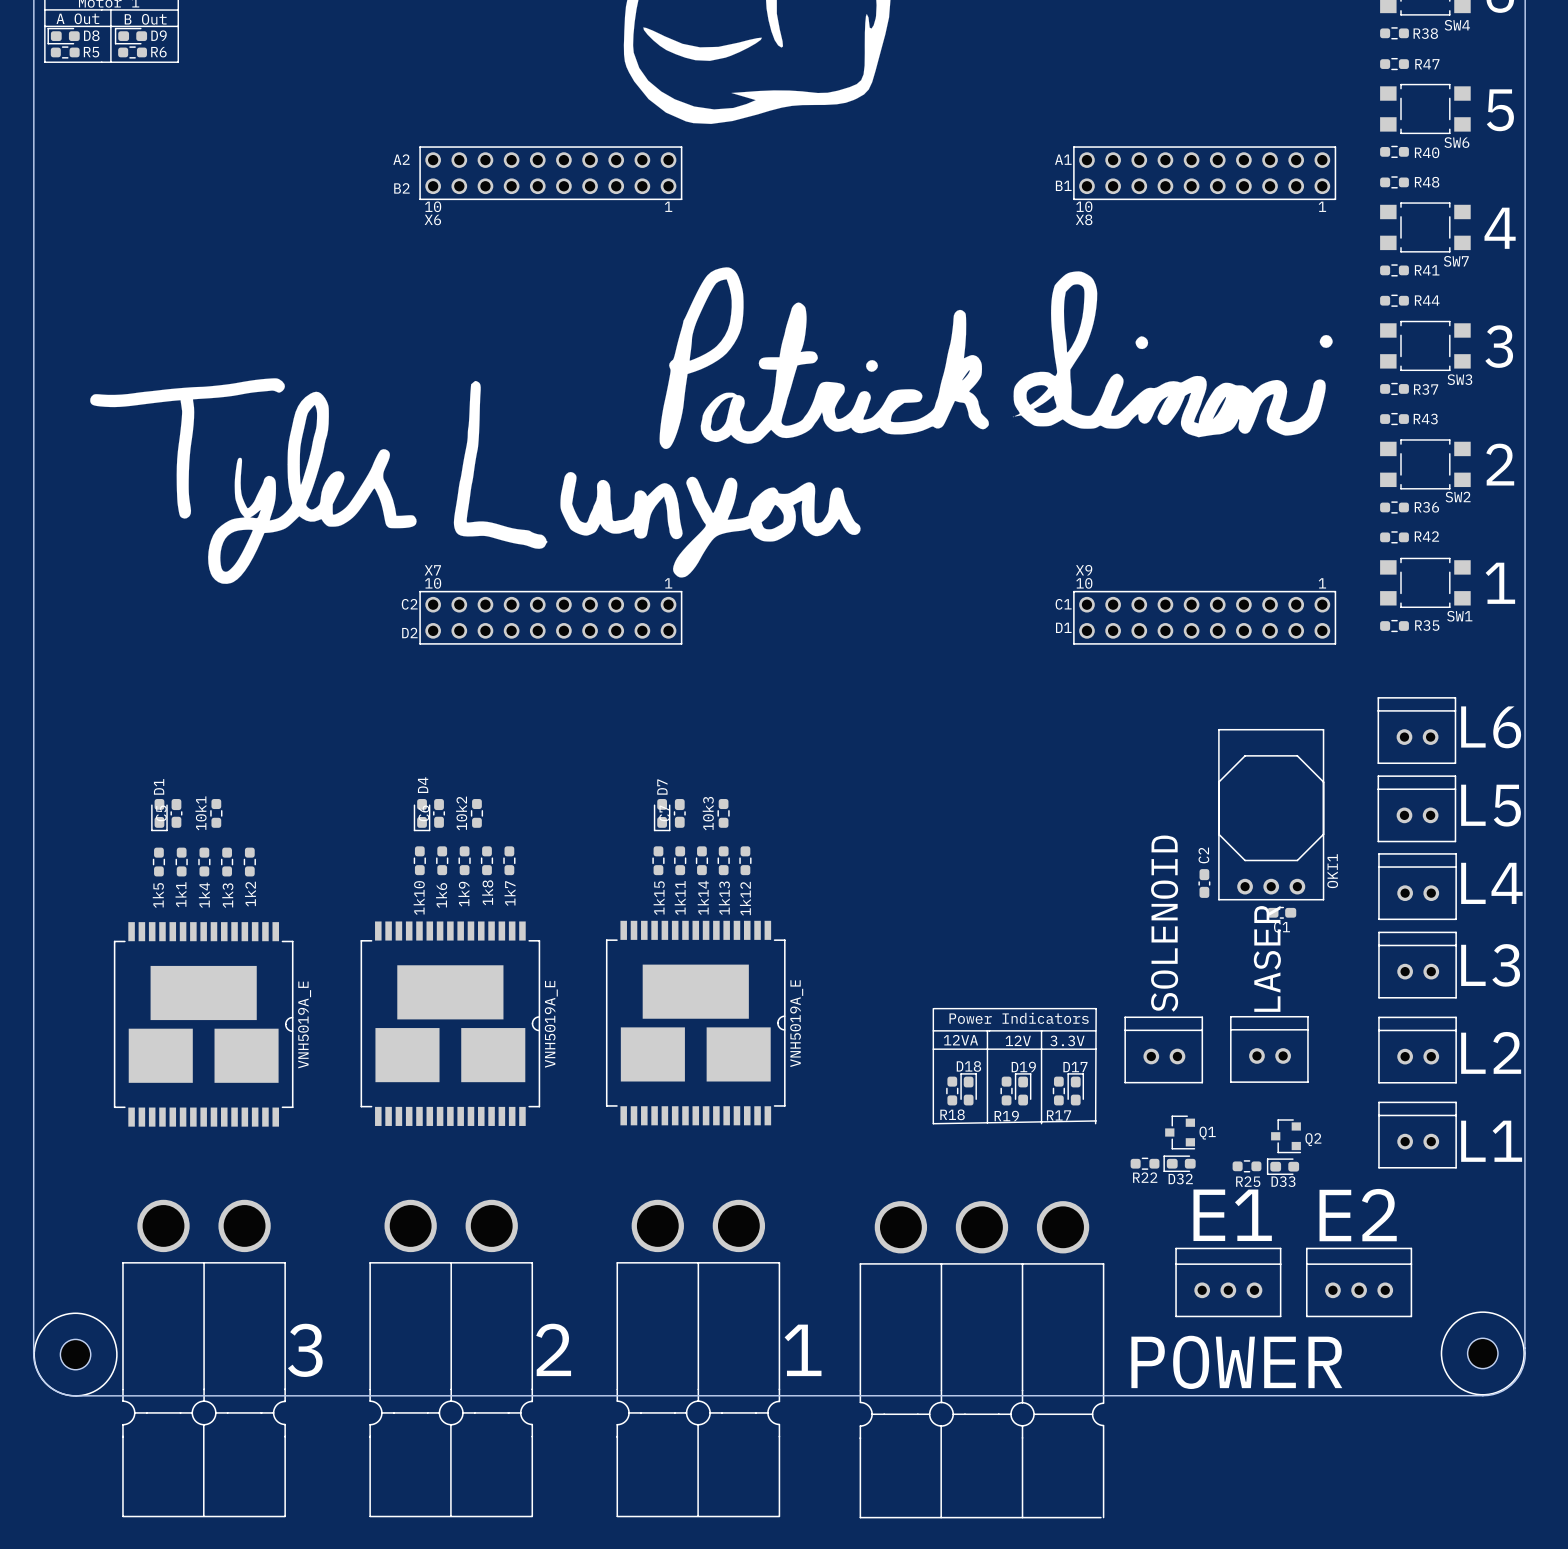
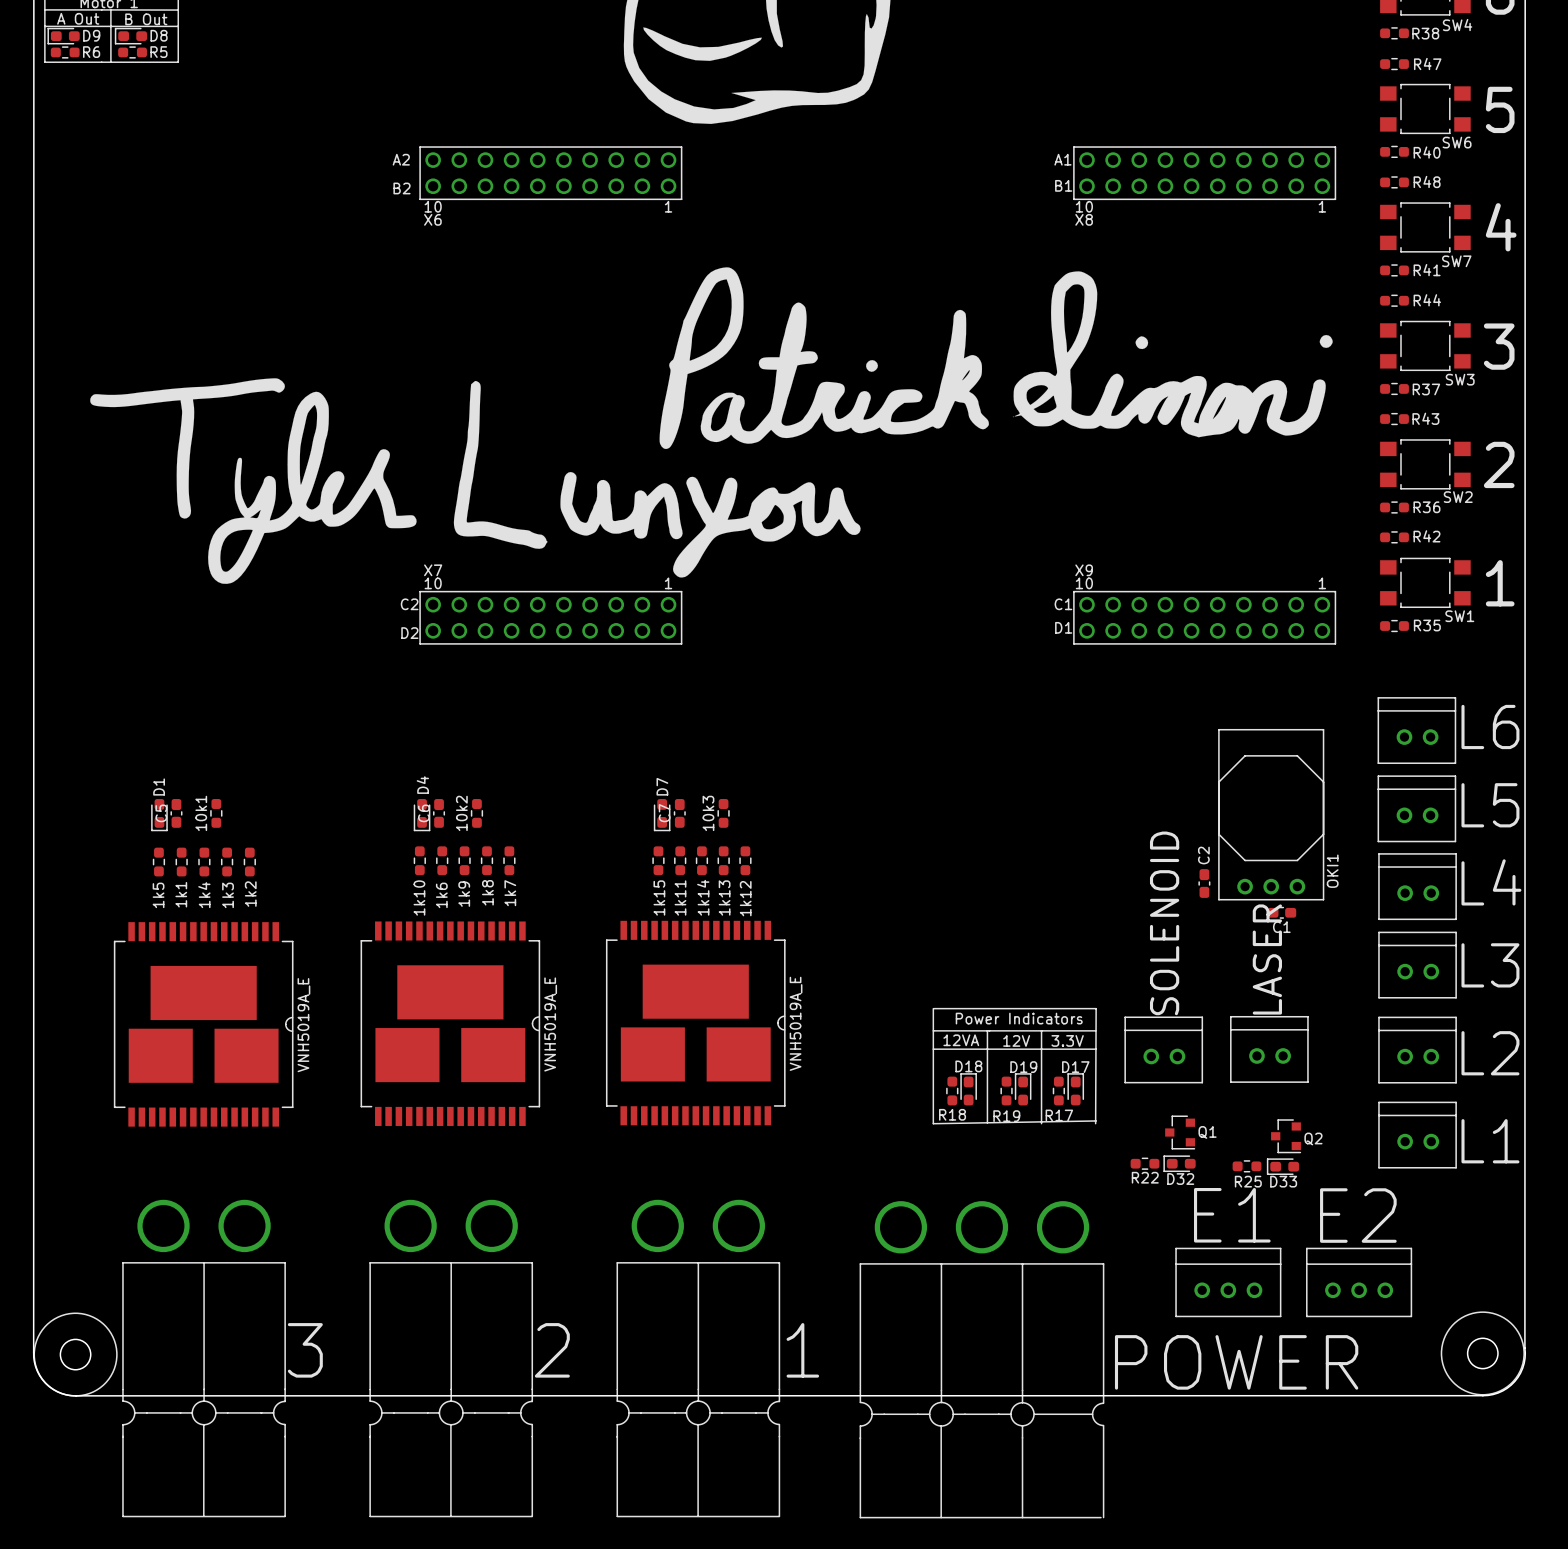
D8 name: D8 (91, 35) -> D9 (91, 35)
D9 name: D9 (159, 35) -> D8 (159, 35)
R5 name: R5 (91, 52) -> R6 (91, 52)
R6 name: R6 (158, 52) -> R5 (158, 52)

